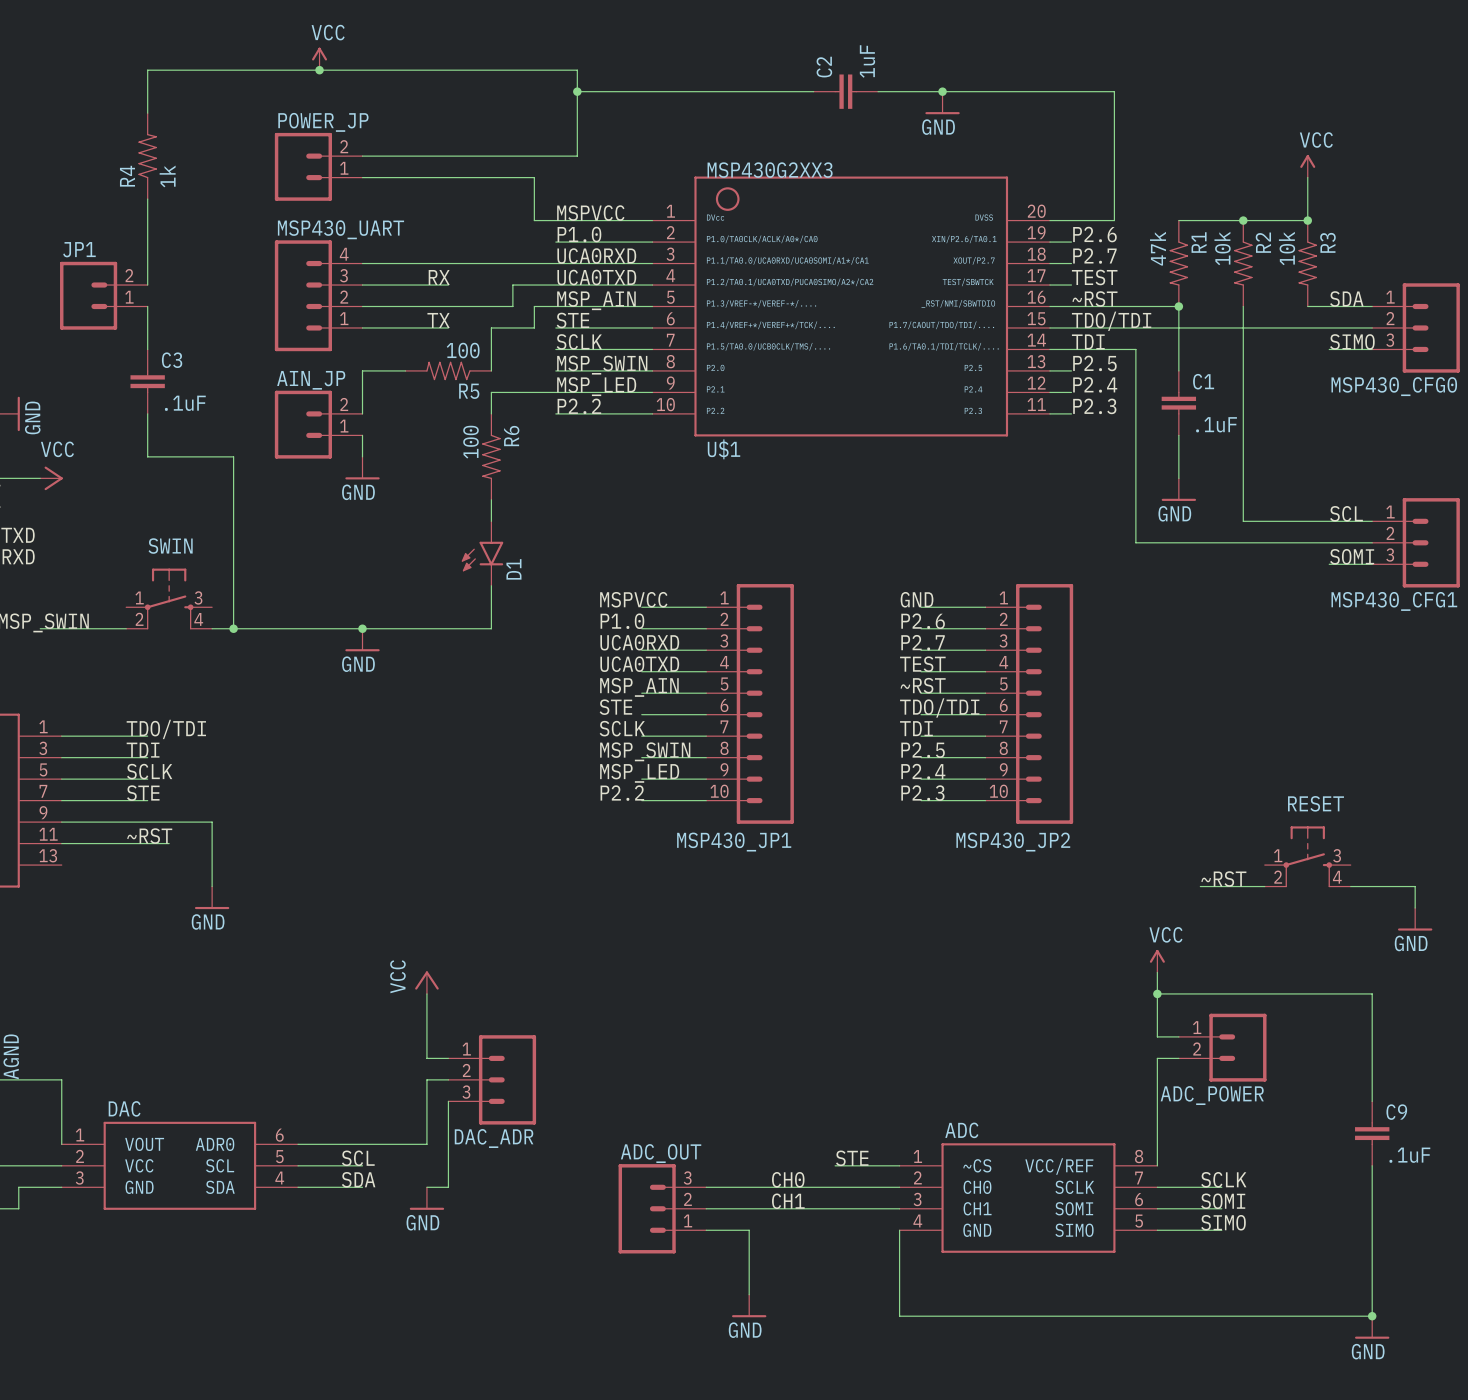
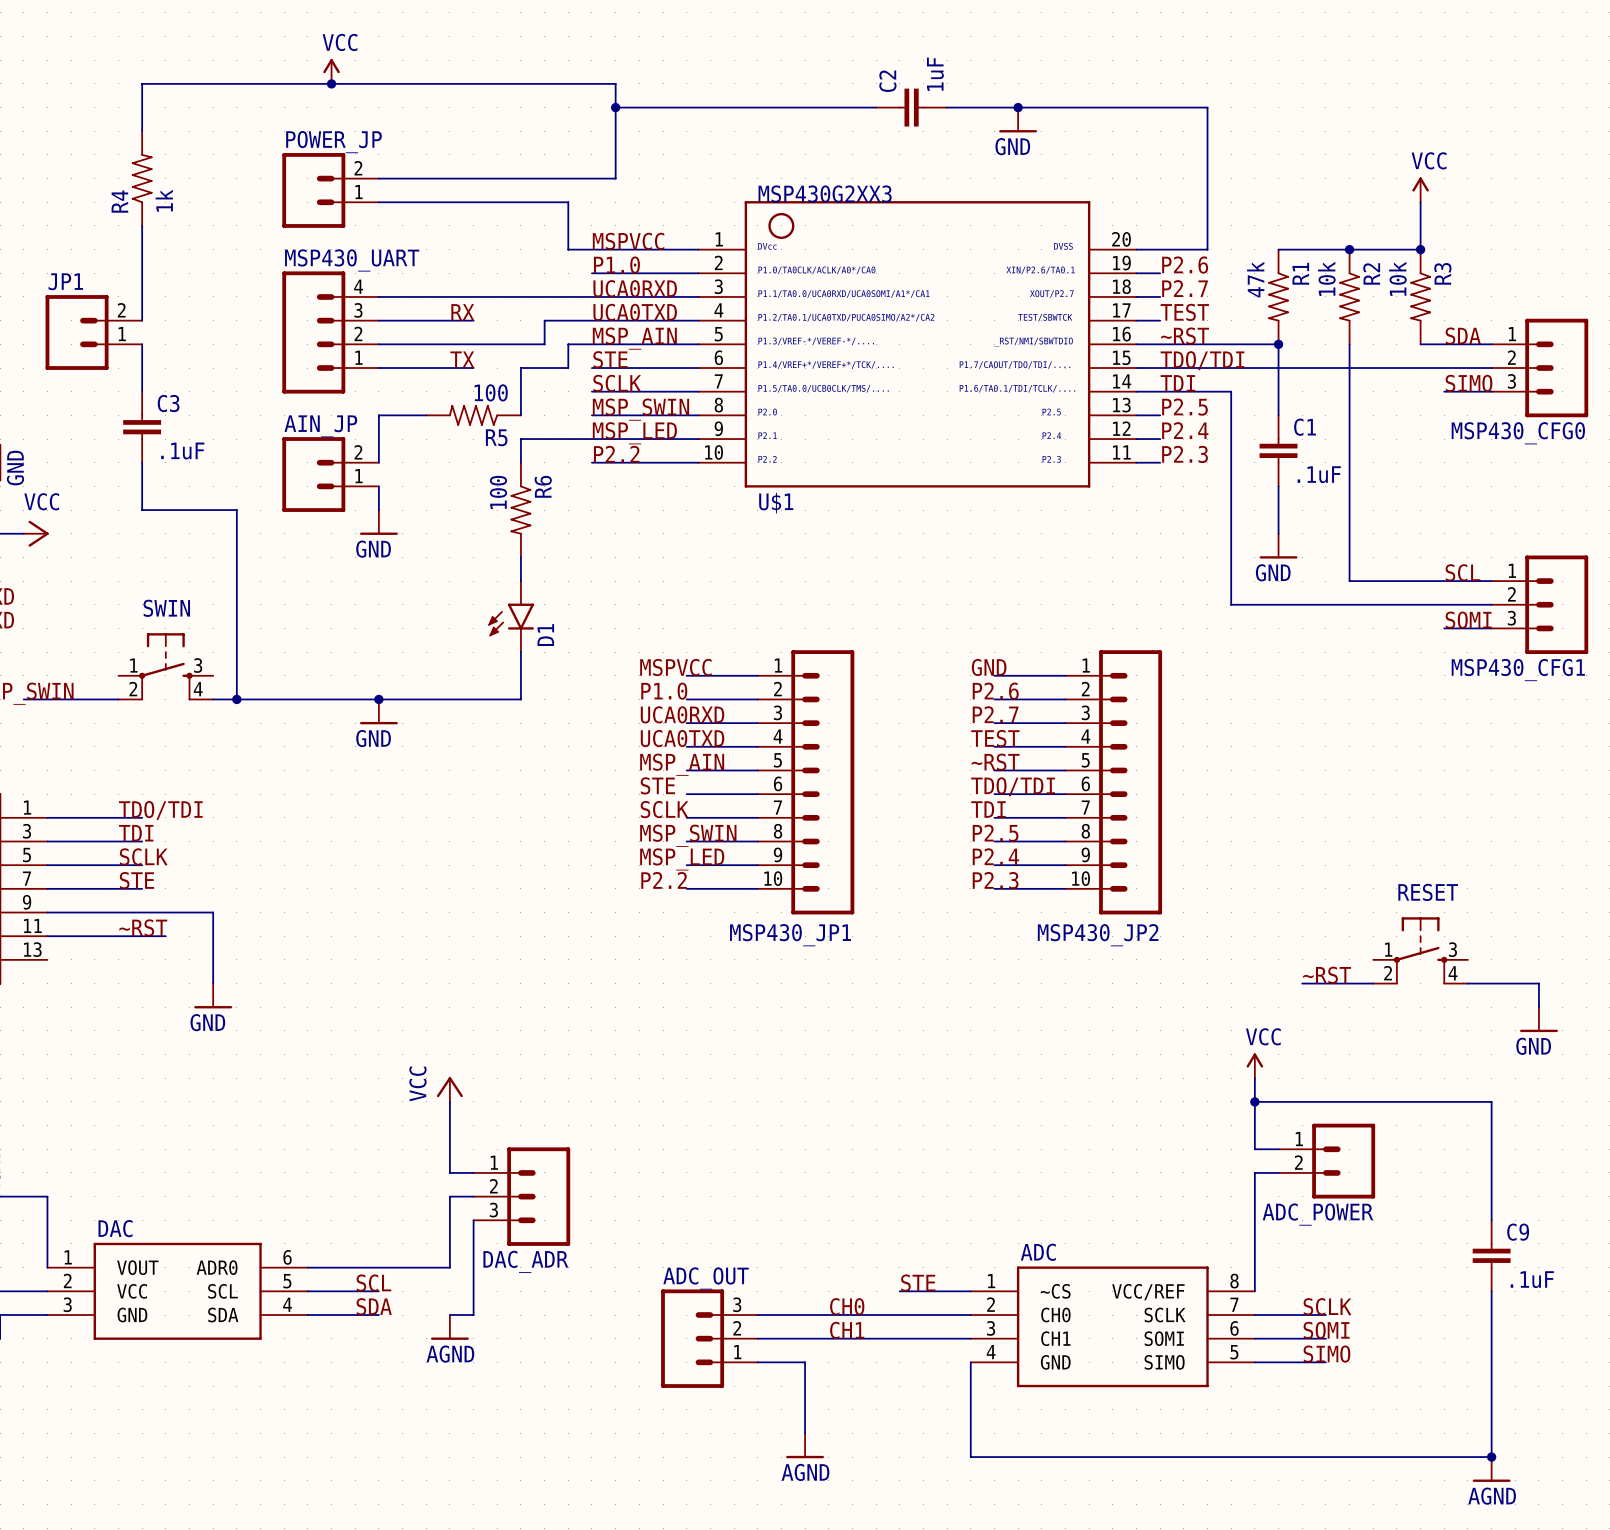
power symbol: GND (426, 1198) -> AGND (449, 1327)
power symbol: GND (749, 1306) -> AGND (805, 1445)
power symbol: GND (1372, 1327) -> AGND (1491, 1469)

